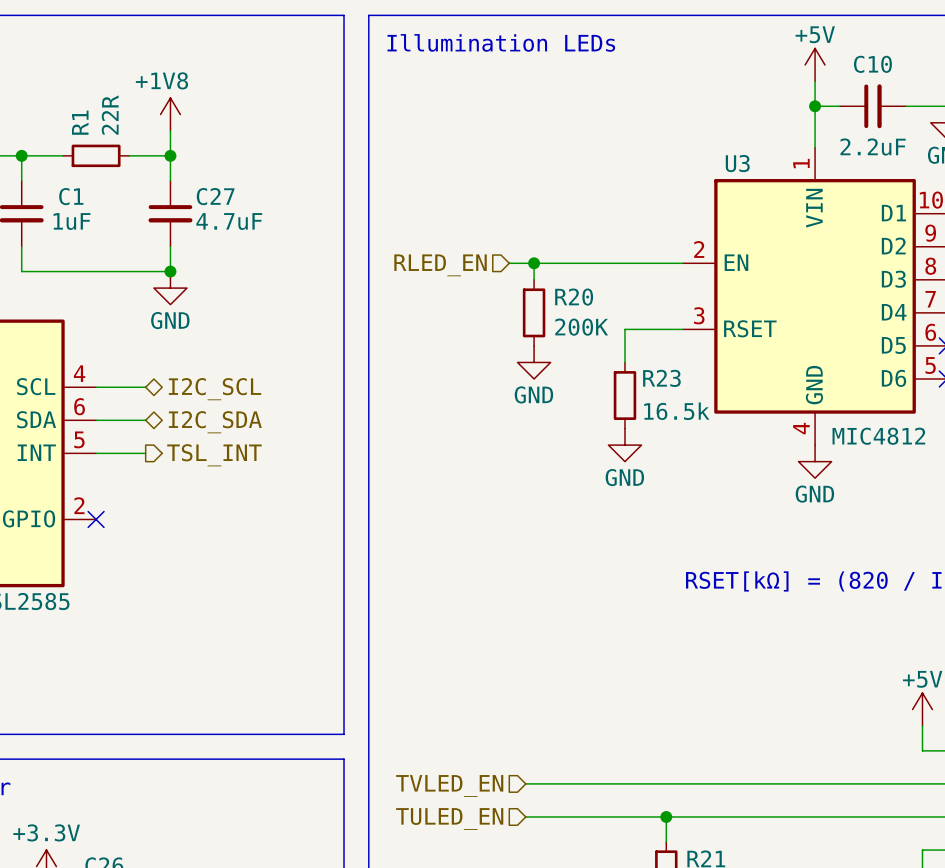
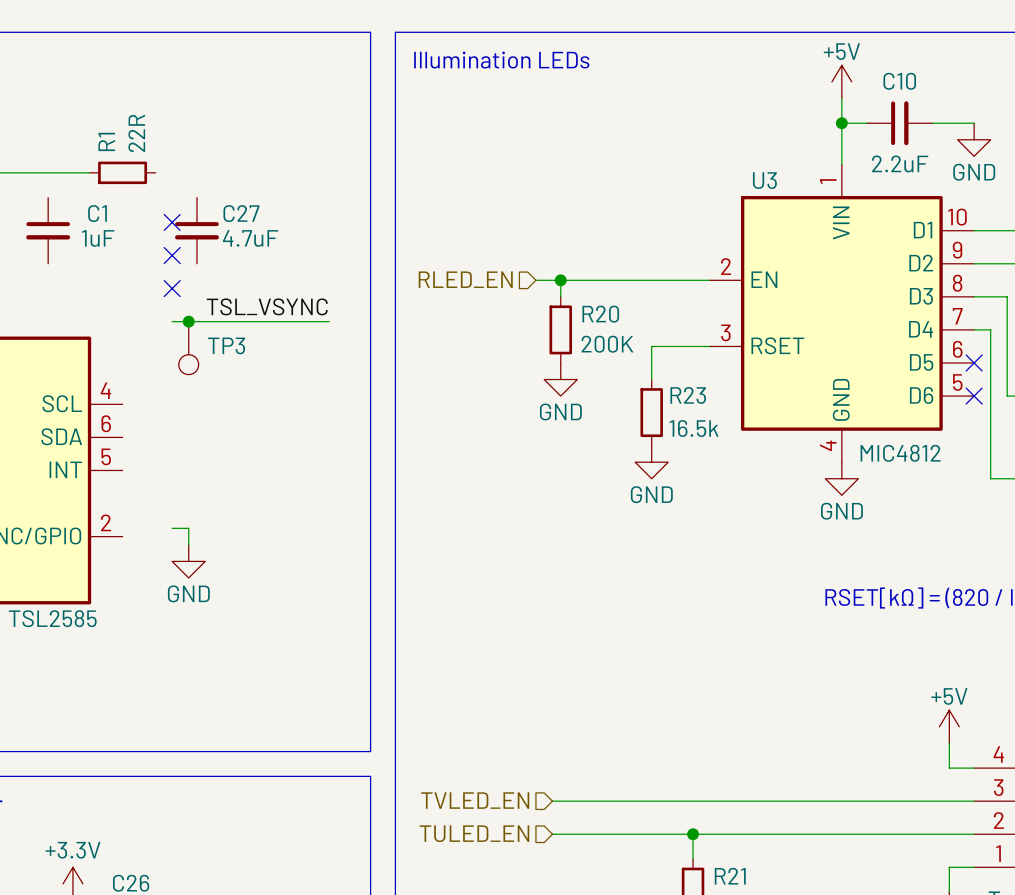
power symbol: +1V8 (170, 114) -> none
wire: (170, 131) (170, 180) -> none
wire: (21, 155) (21, 180) -> none
junction: (21, 155) -> none
wire: (129, 155) (170, 155) -> none
junction: (170, 155) -> none
no-connect mark: none -> (172, 222)
no-connect mark: none -> (172, 255)
wire: (21, 246) (21, 271) (170, 271) (170, 246) -> none
no-connect mark: none -> (172, 288)
junction position: (170, 271) -> (188, 321)
power symbol: GND (170, 288) -> none
label: none -> TSL_VSYNC (267, 306)
wire: none -> (172, 321) (329, 321)
TP3: none -> (188, 348)
wire: (96, 387) (145, 387) -> none
hierarchical label: I2C_SCL (215, 389) -> none
wire: (96, 420) (145, 420) -> none
hierarchical label: I2C_SDA (215, 422) -> none
wire: (96, 453) (145, 453) -> none
hierarchical label: TSL_INT (214, 455) -> none
wire: none -> (172, 528) (188, 528) (188, 544)
no-connect mark: (96, 519) -> none
power symbol: none -> GND (188, 561)

